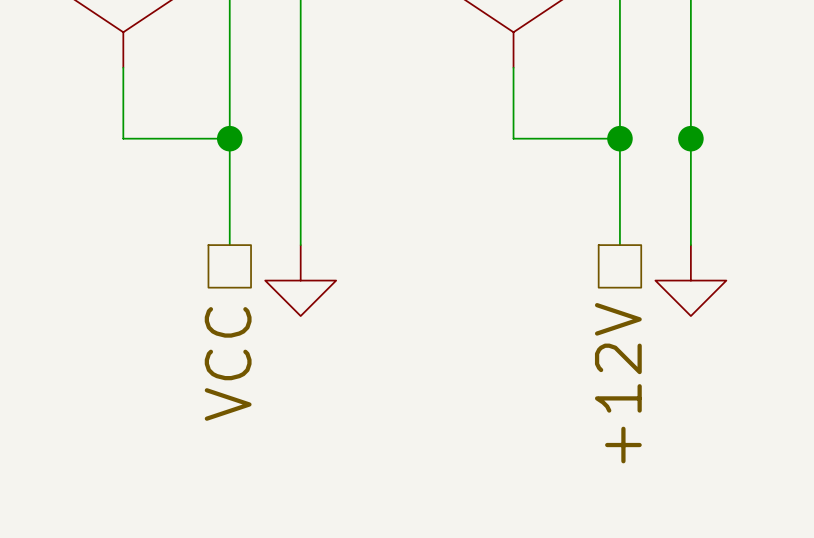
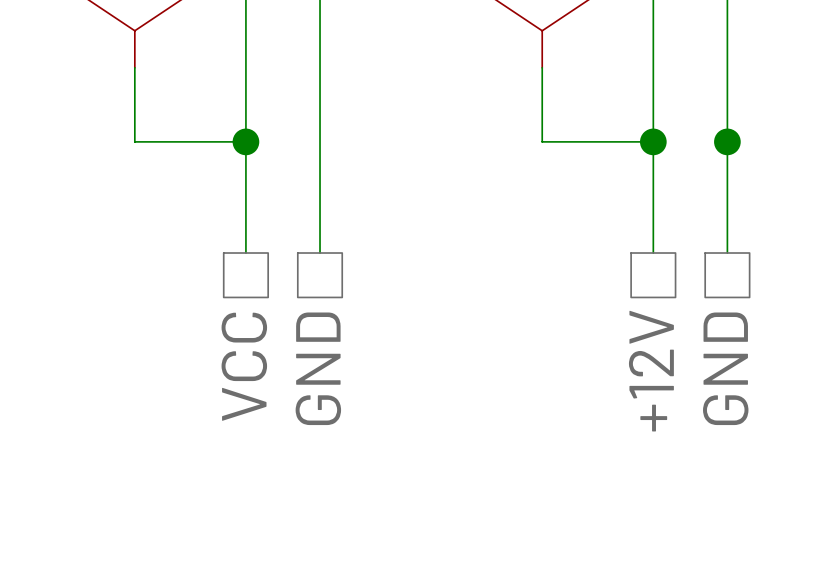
power symbol: (300, 280) -> none
power symbol: (690, 280) -> none
hierarchical label: none -> GND (318, 368)
hierarchical label: none -> GND (725, 368)

